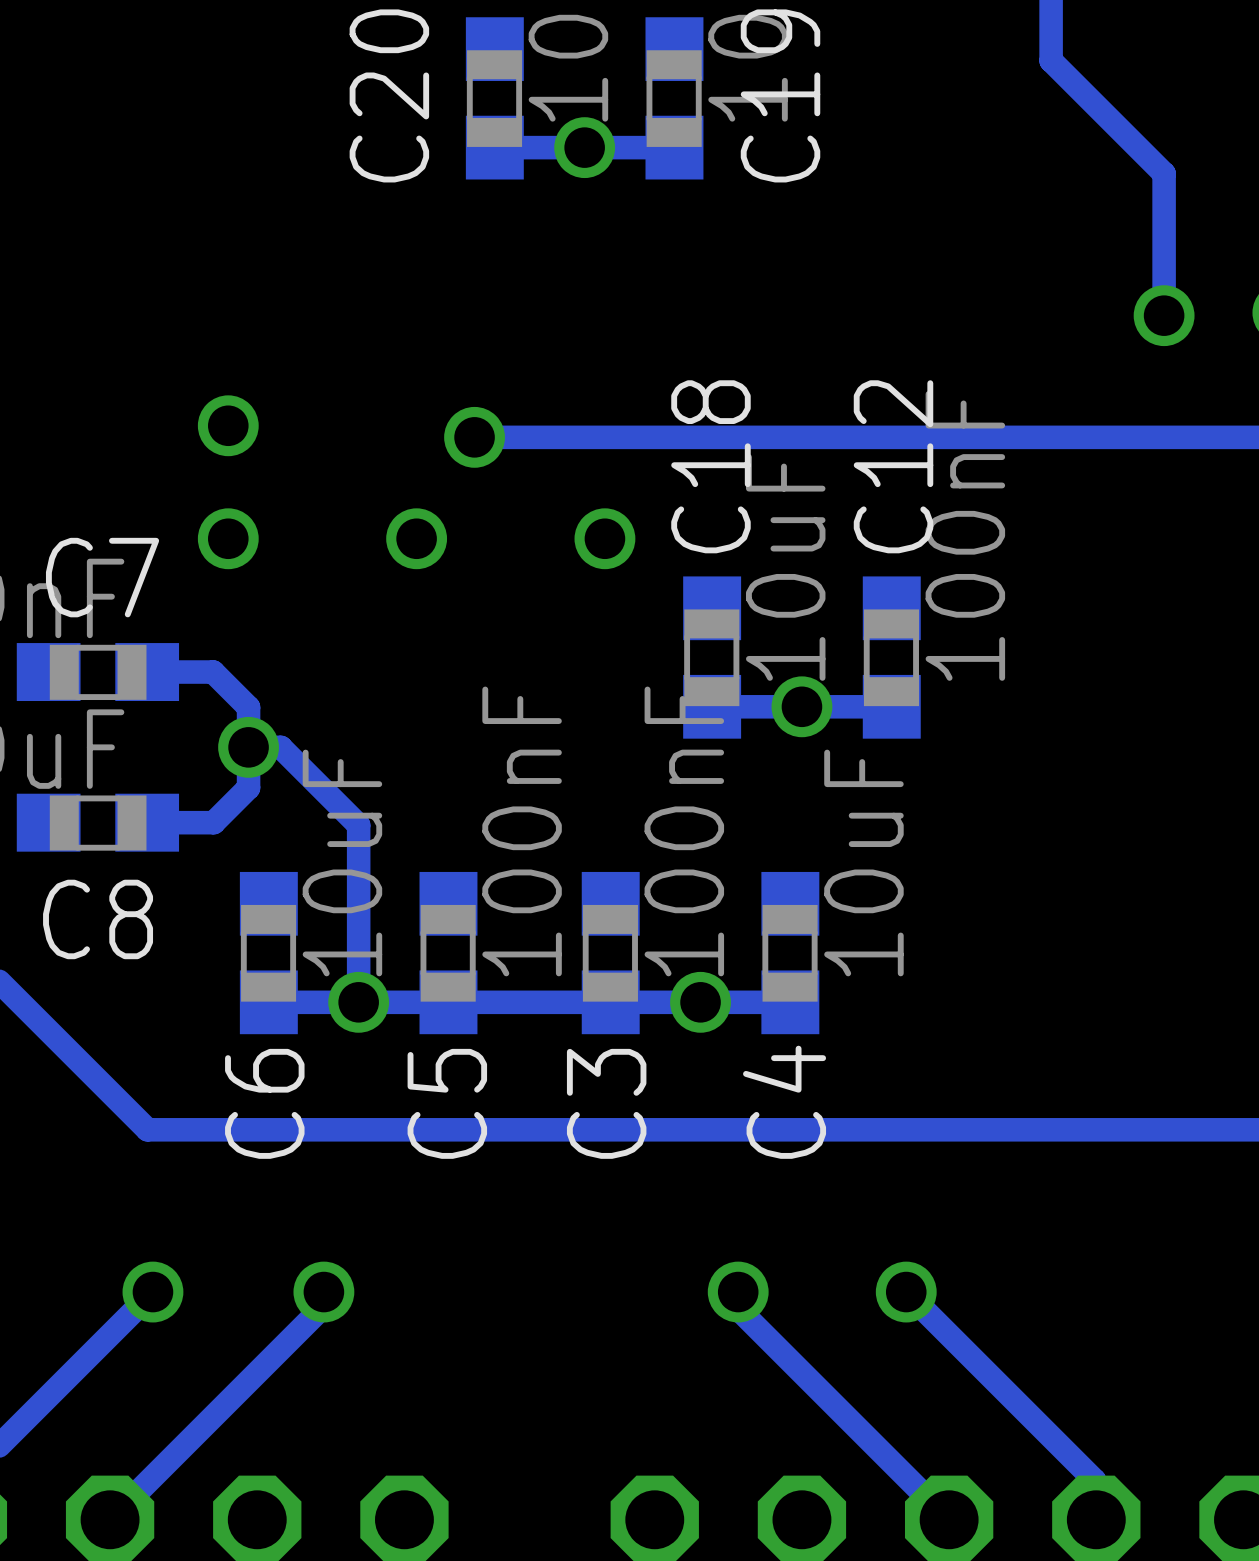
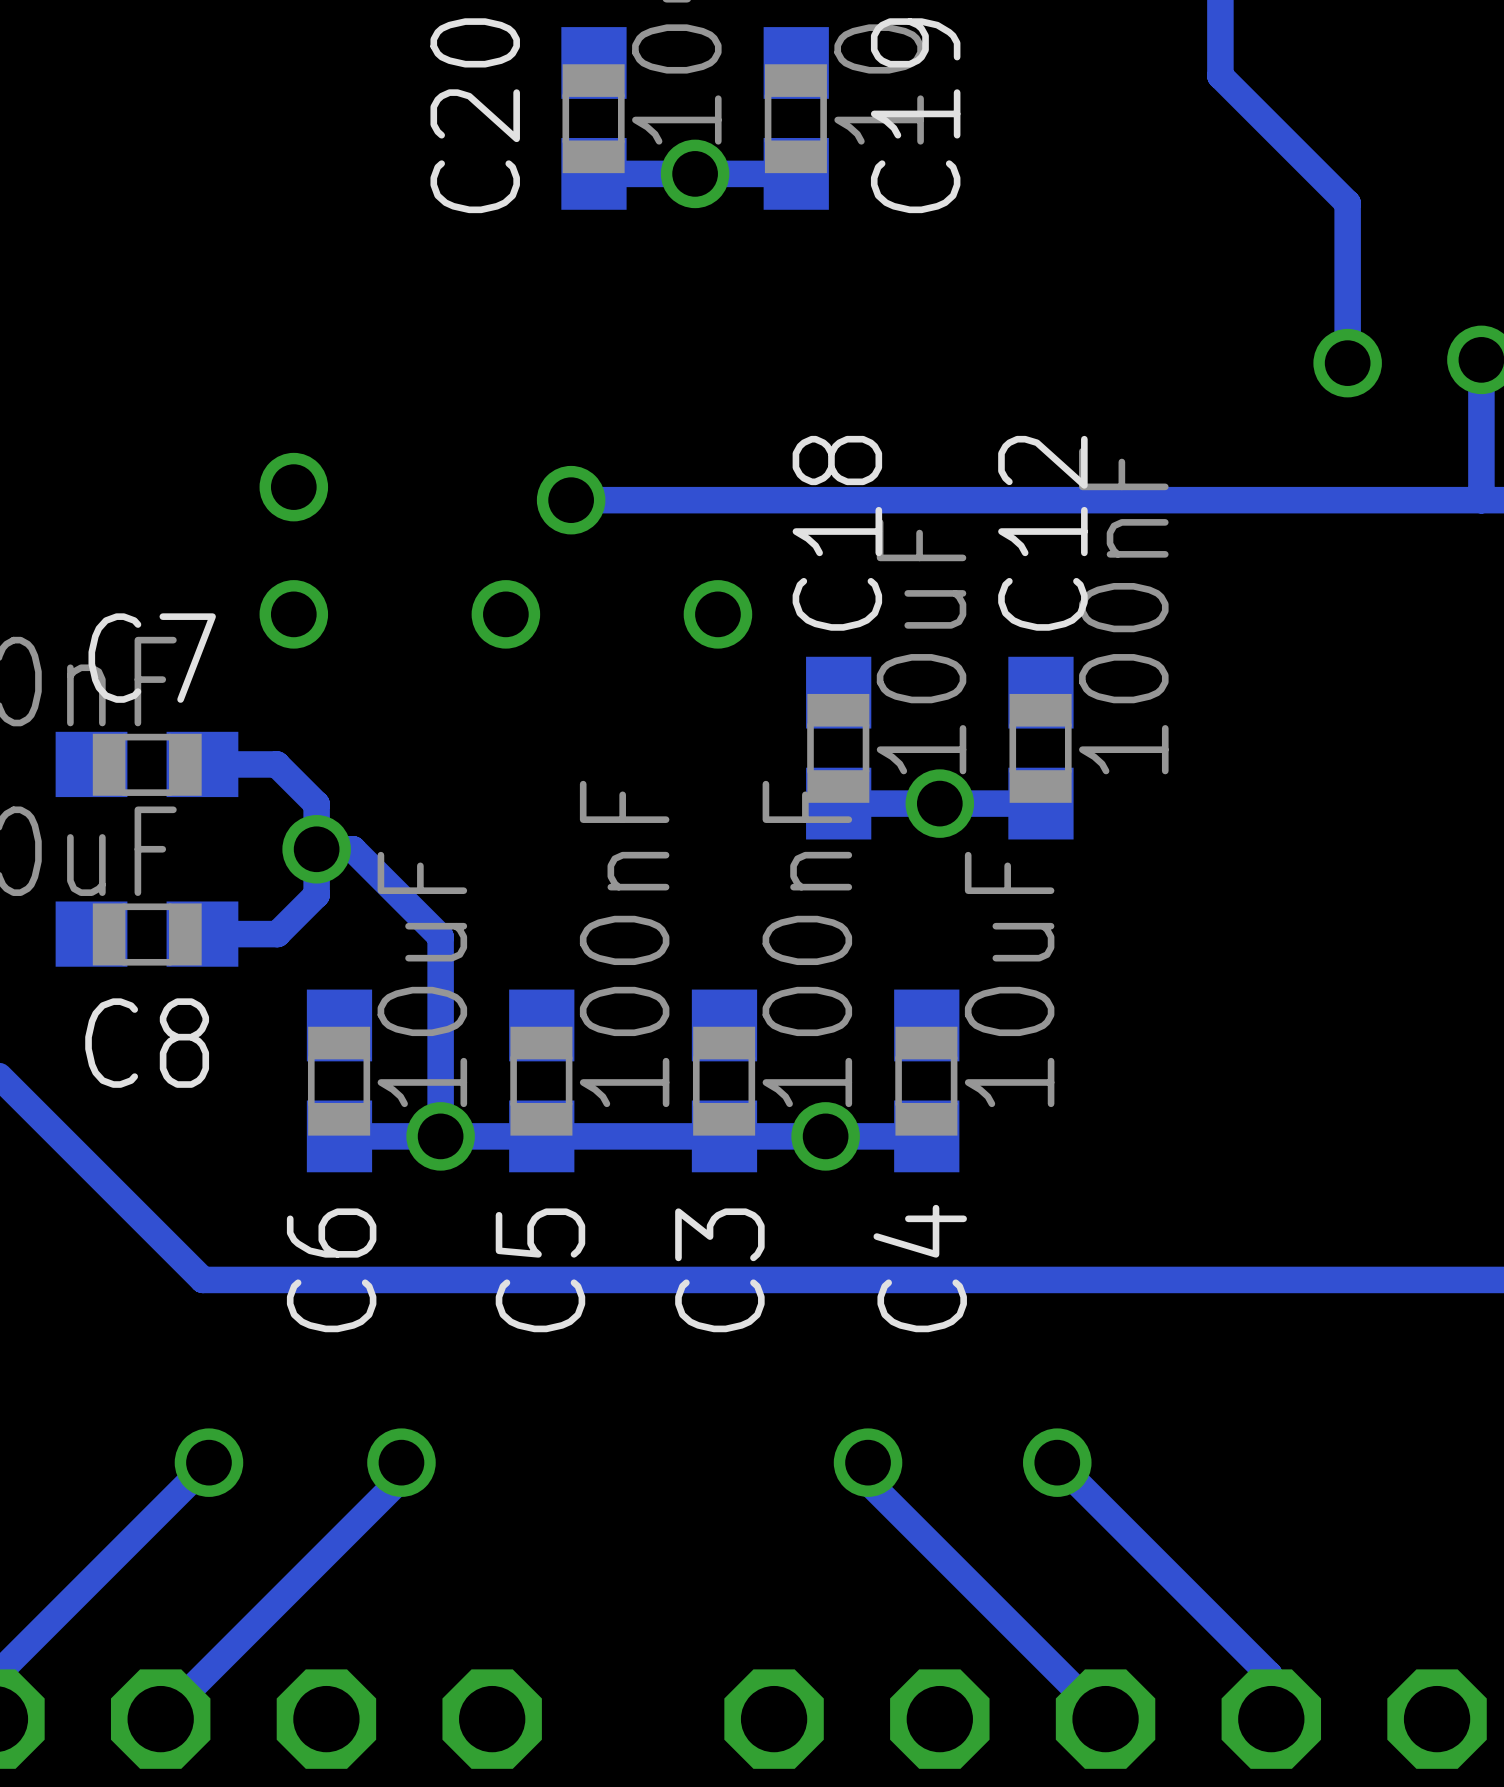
C4 name position: C4 (784, 1102) -> C4 (920, 1268)
C6 name position: C6 (264, 1103) -> C6 (331, 1270)
C5 name position: C5 (447, 1103) -> C5 (540, 1270)
C3 name position: C3 (606, 1103) -> C3 (719, 1270)

